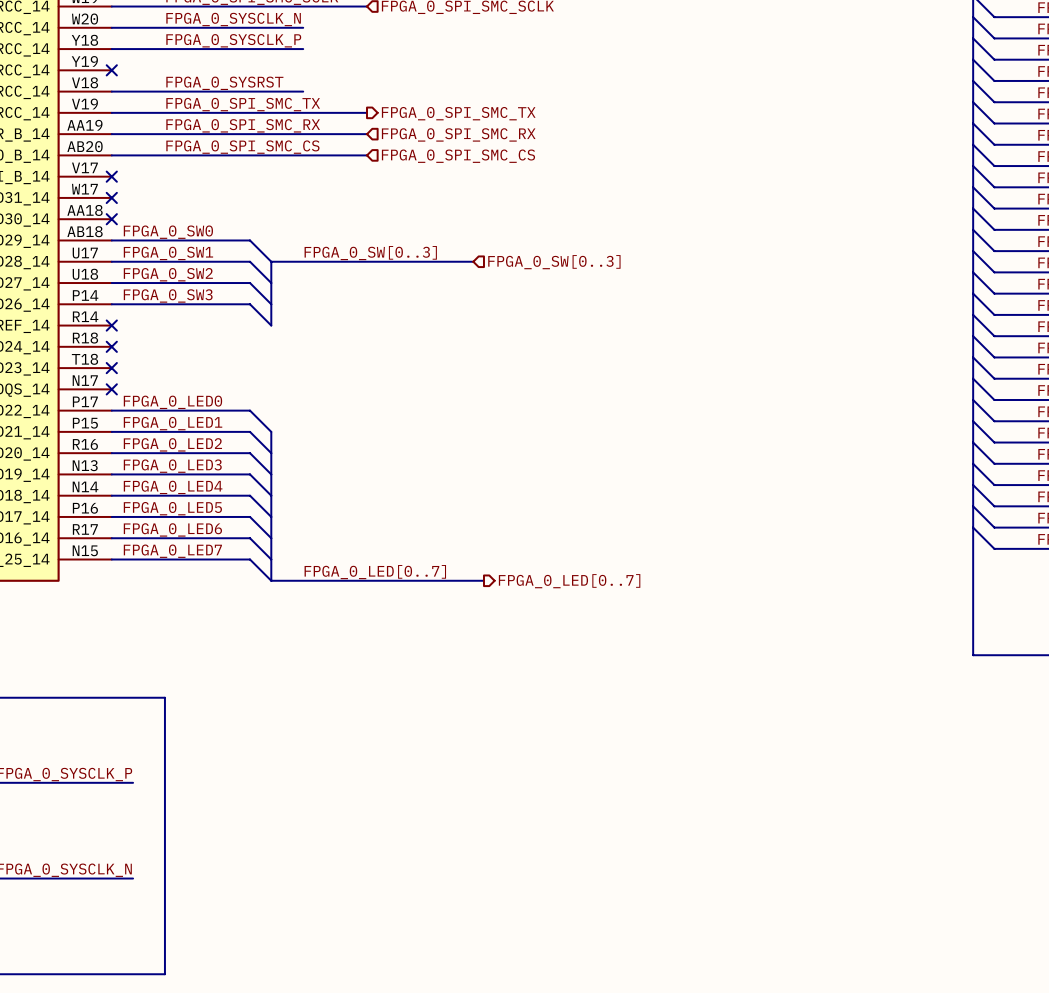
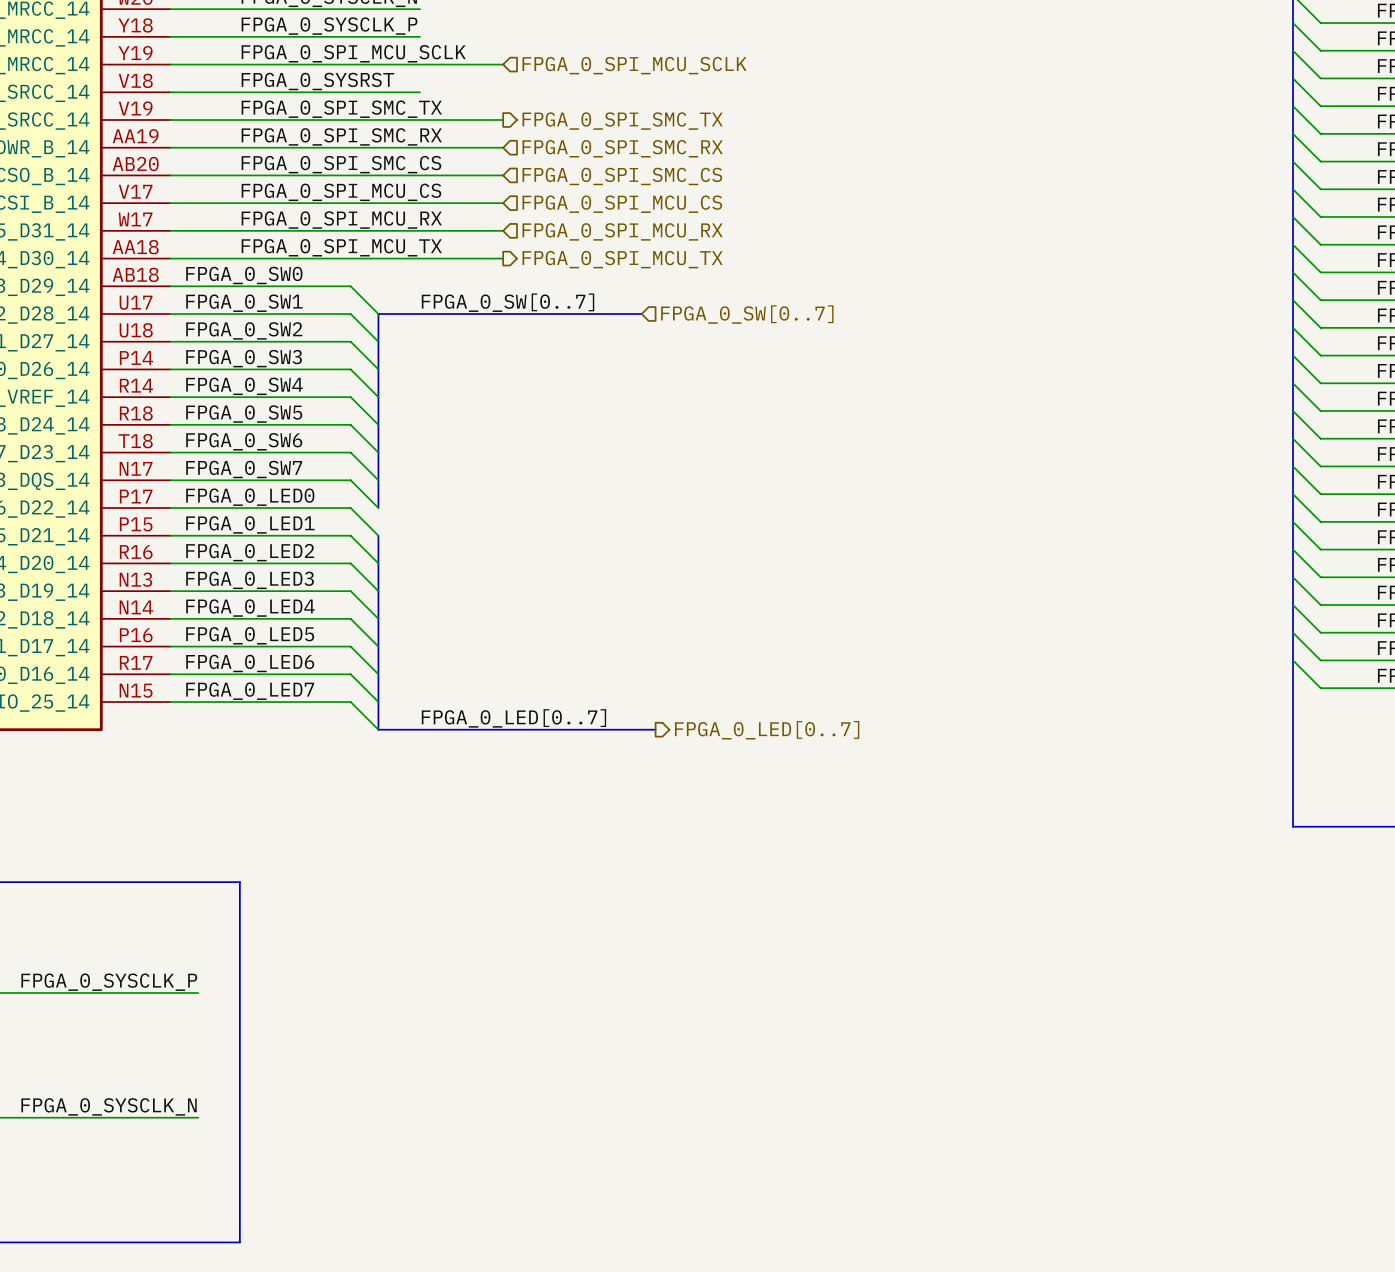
label: none -> FPGA_0_SPI_MCU_SCLK (353, 53)
wire: none -> (170, 64) (503, 64)
no-connect mark: (111, 70) -> none
hierarchical label: none -> FPGA_0_SPI_MCU_SCLK (634, 65)
label: none -> FPGA_0_SPI_MCU_CS (341, 192)
wire: none -> (170, 203) (503, 203)
no-connect mark: (111, 176) -> none
hierarchical label: none -> FPGA_0_SPI_MCU_CS (622, 204)
label: none -> FPGA_0_SPI_MCU_RX (341, 220)
wire: none -> (170, 230) (503, 230)
no-connect mark: (111, 197) -> none
hierarchical label: none -> FPGA_0_SPI_MCU_RX (622, 231)
label: none -> FPGA_0_SPI_MCU_TX (341, 247)
wire: none -> (170, 258) (503, 258)
no-connect mark: (111, 219) -> none
hierarchical label: none -> FPGA_0_SPI_MCU_TX (622, 259)
label: FPGA_0_SW[0..3] (370, 253) -> FPGA_0_SW[0..7] (508, 302)
hierarchical label: FPGA_0_SW[0..3] (554, 262) -> FPGA_0_SW[0..7] (747, 314)
label: none -> FPGA_0_SW4 (244, 386)
wire: none -> (170, 397) (350, 397) (378, 424)
no-connect mark: (111, 325) -> none
bus: none -> (378, 397) (378, 508)
label: none -> FPGA_0_SW5 (244, 414)
wire: none -> (170, 424) (350, 424) (378, 452)
no-connect mark: (111, 346) -> none
label: none -> FPGA_0_SW6 (244, 441)
wire: none -> (170, 452) (350, 452) (378, 480)
no-connect mark: (111, 368) -> none
label: none -> FPGA_0_SW7 (244, 469)
wire: none -> (170, 480) (350, 480) (378, 508)
no-connect mark: (111, 389) -> none

